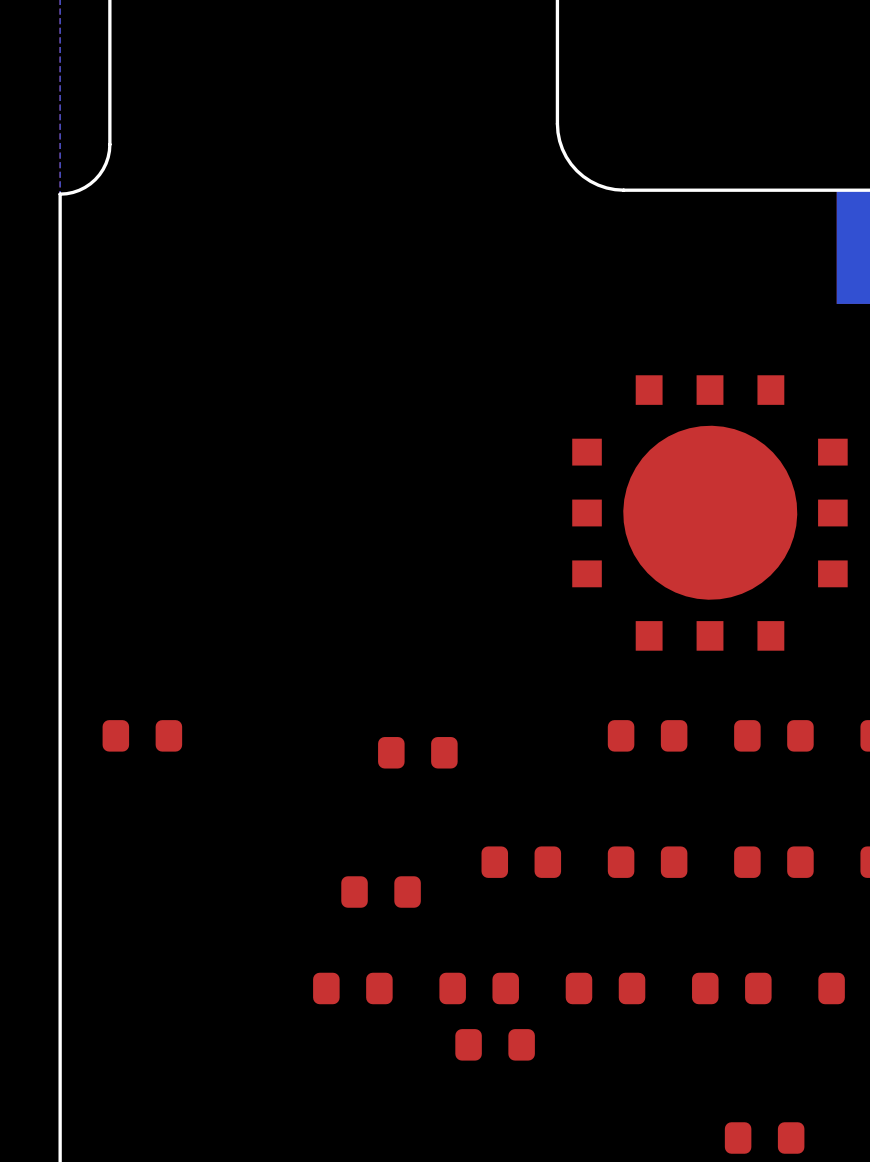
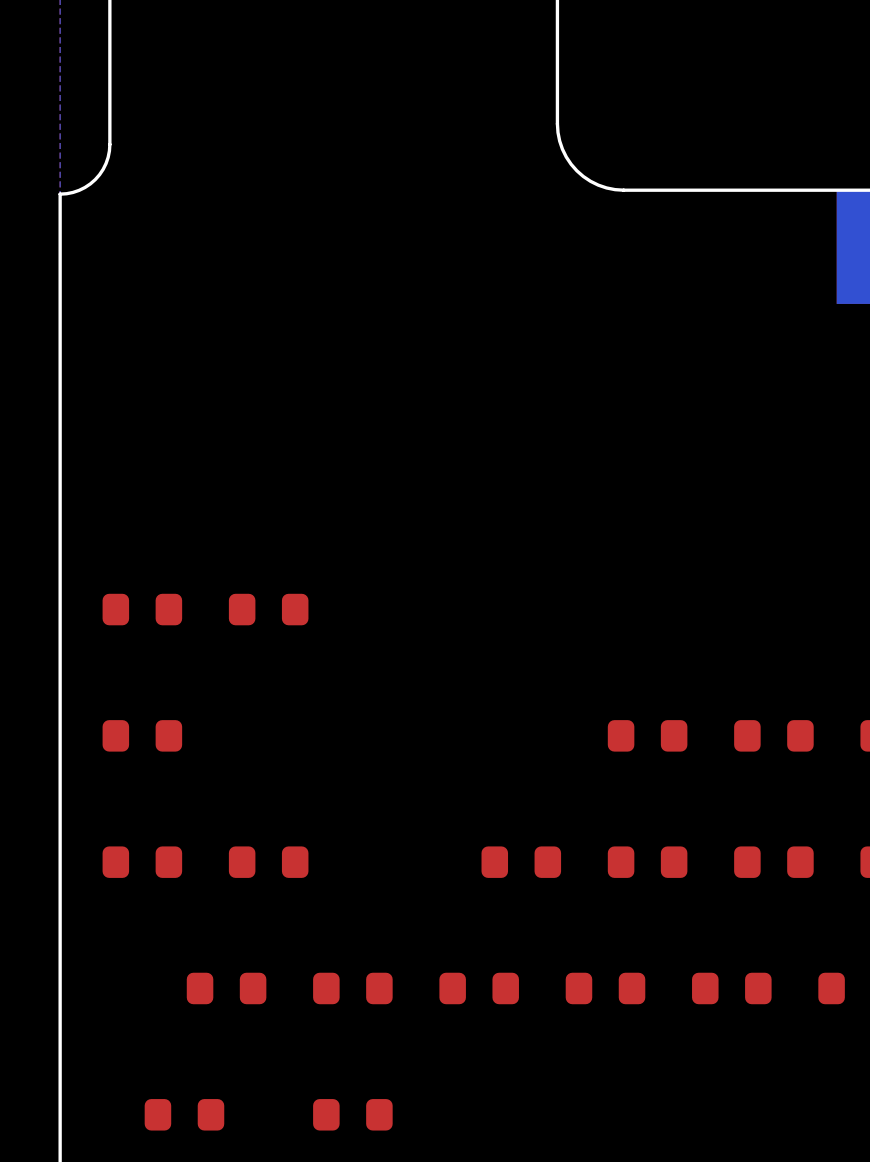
part: (709, 512) -> none
part: none -> (142, 609)
part: none -> (268, 609)
part: (417, 752) -> none
part: none -> (142, 862)
part: none -> (268, 862)
part: (381, 892) -> none
part: none -> (226, 988)
part: (495, 1044) -> none
part: none -> (184, 1114)
part: none -> (352, 1114)
part: (764, 1138) -> none

